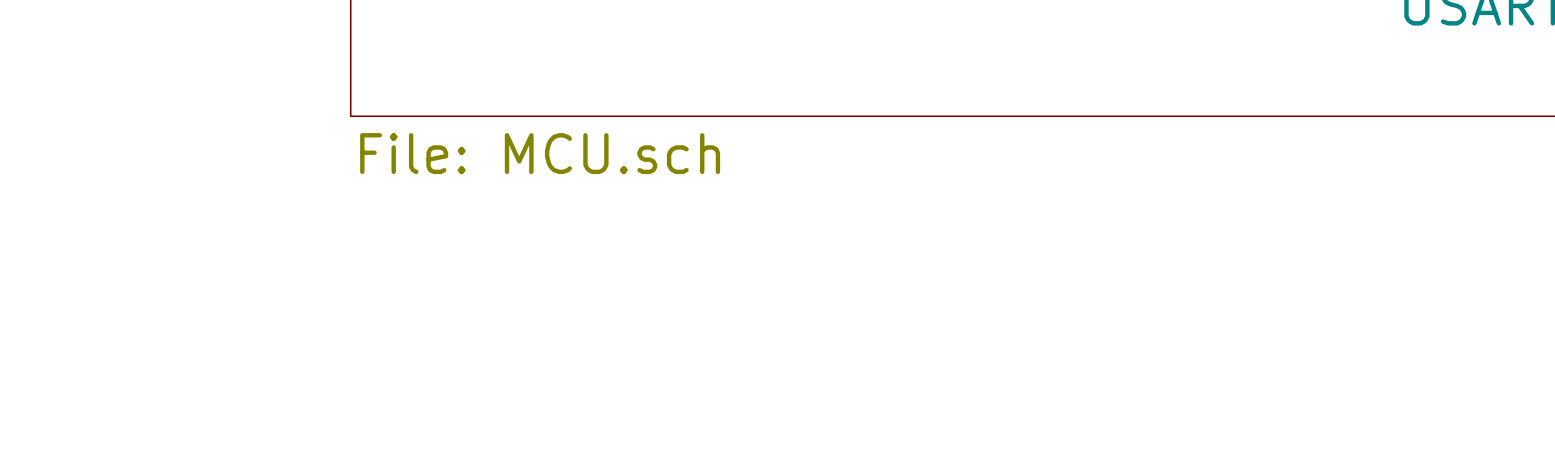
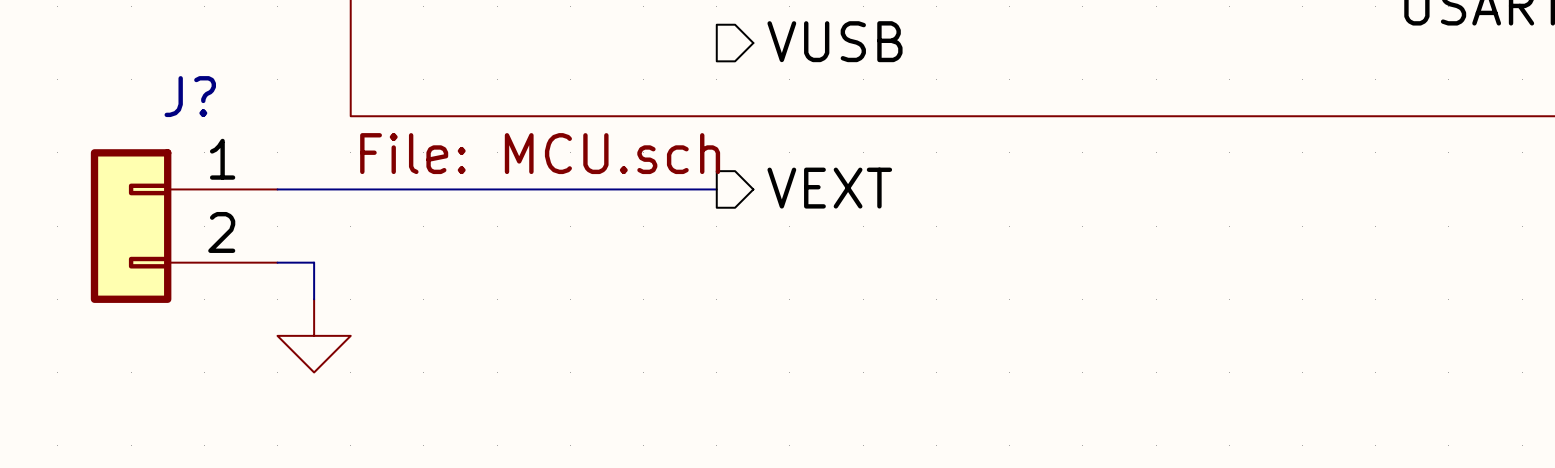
sheet pin: none -> VUSB (835, 41)
sheet pin: none -> VEXT (829, 188)
wire: none -> (277, 189) (716, 189)
J?: none -> (184, 226)
wire: none -> (277, 262) (314, 262) (314, 299)
power symbol: none -> (314, 335)

